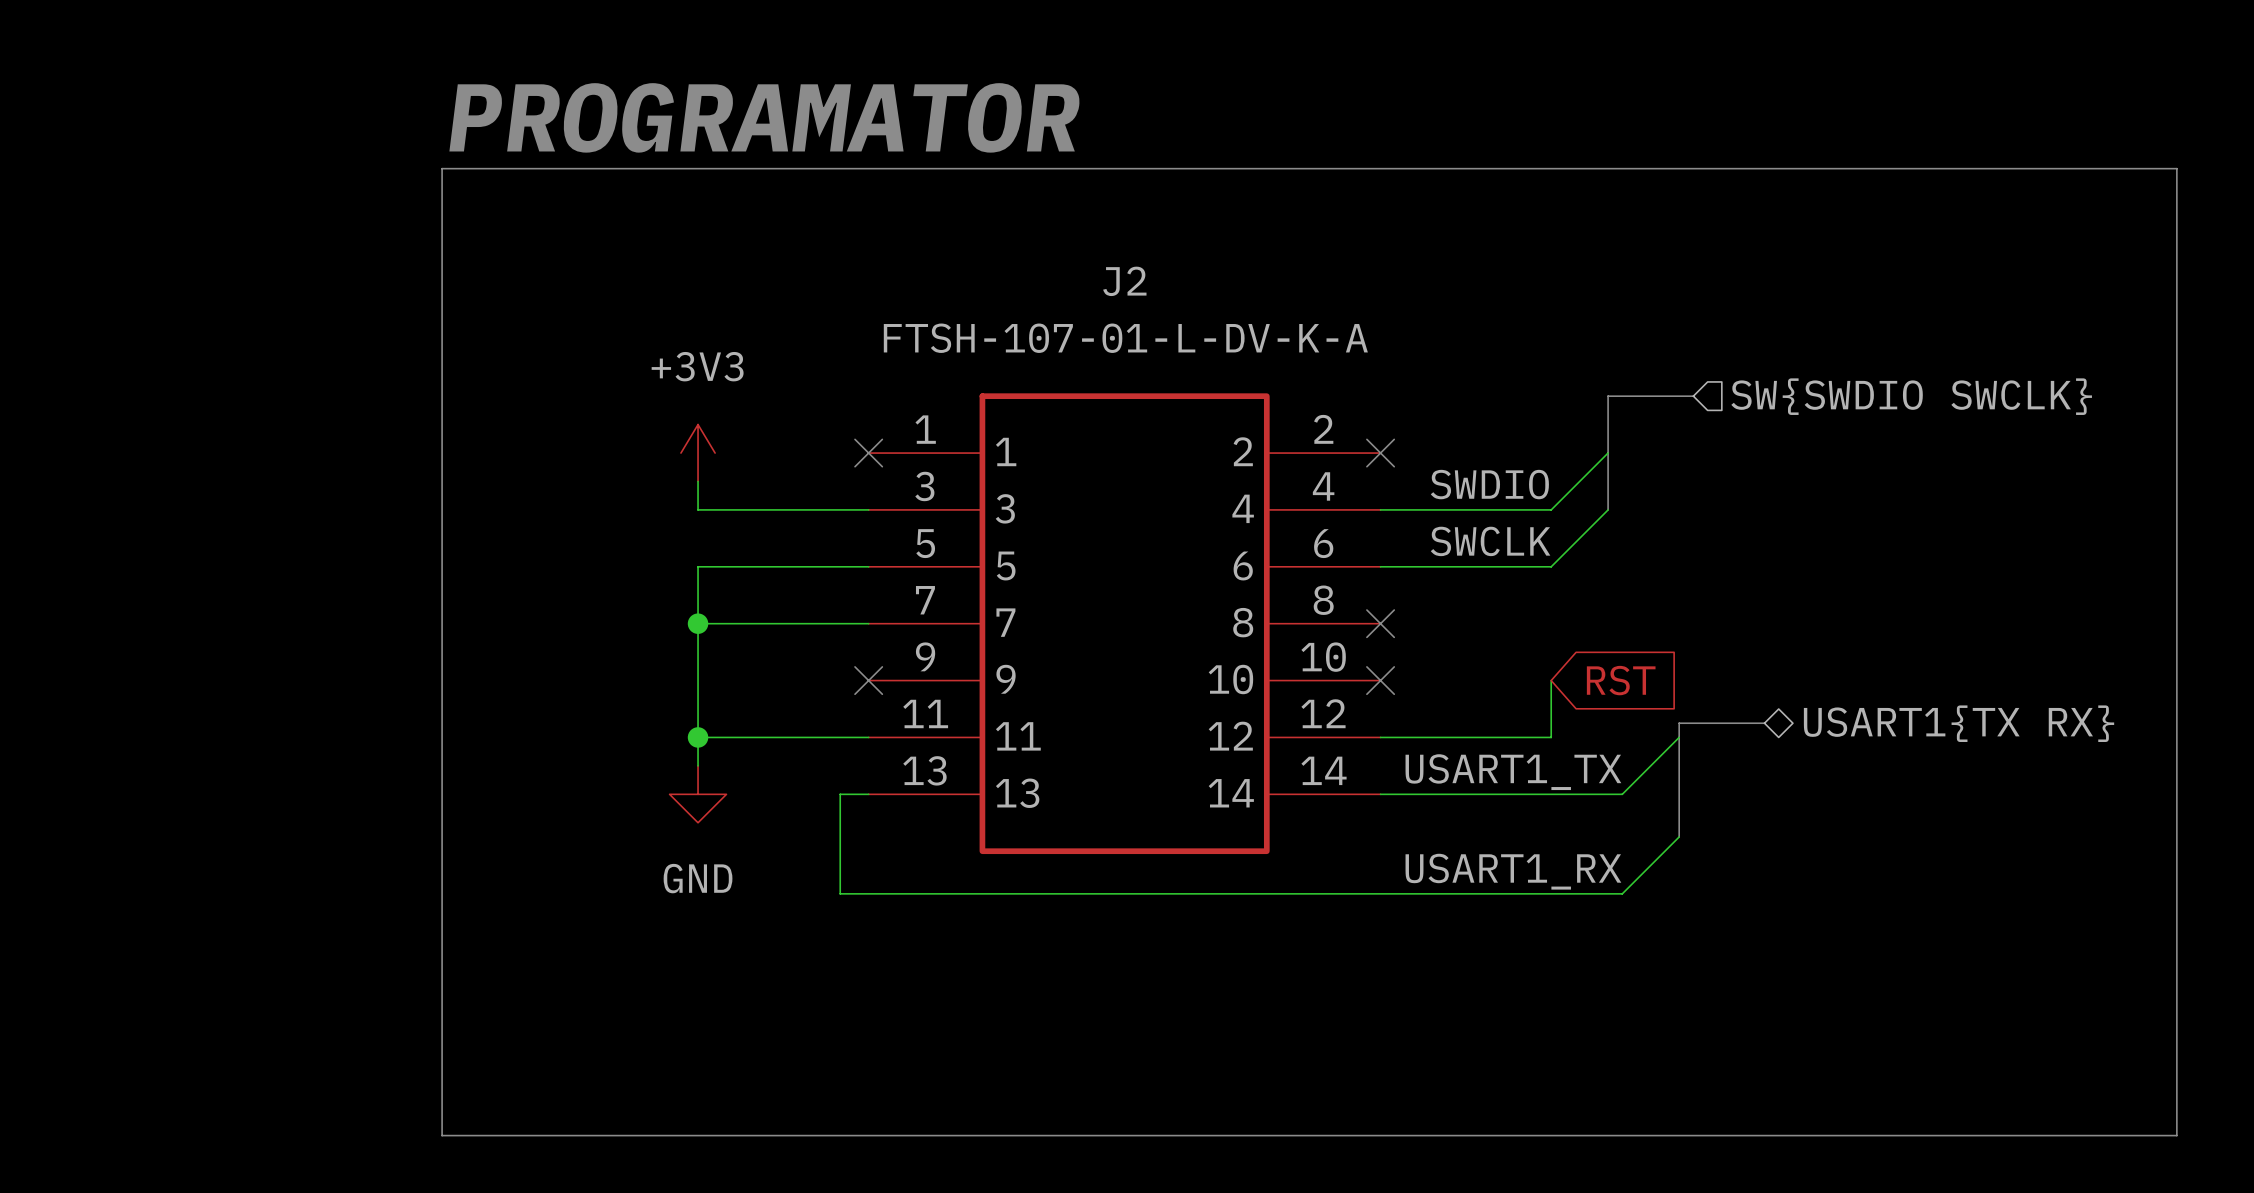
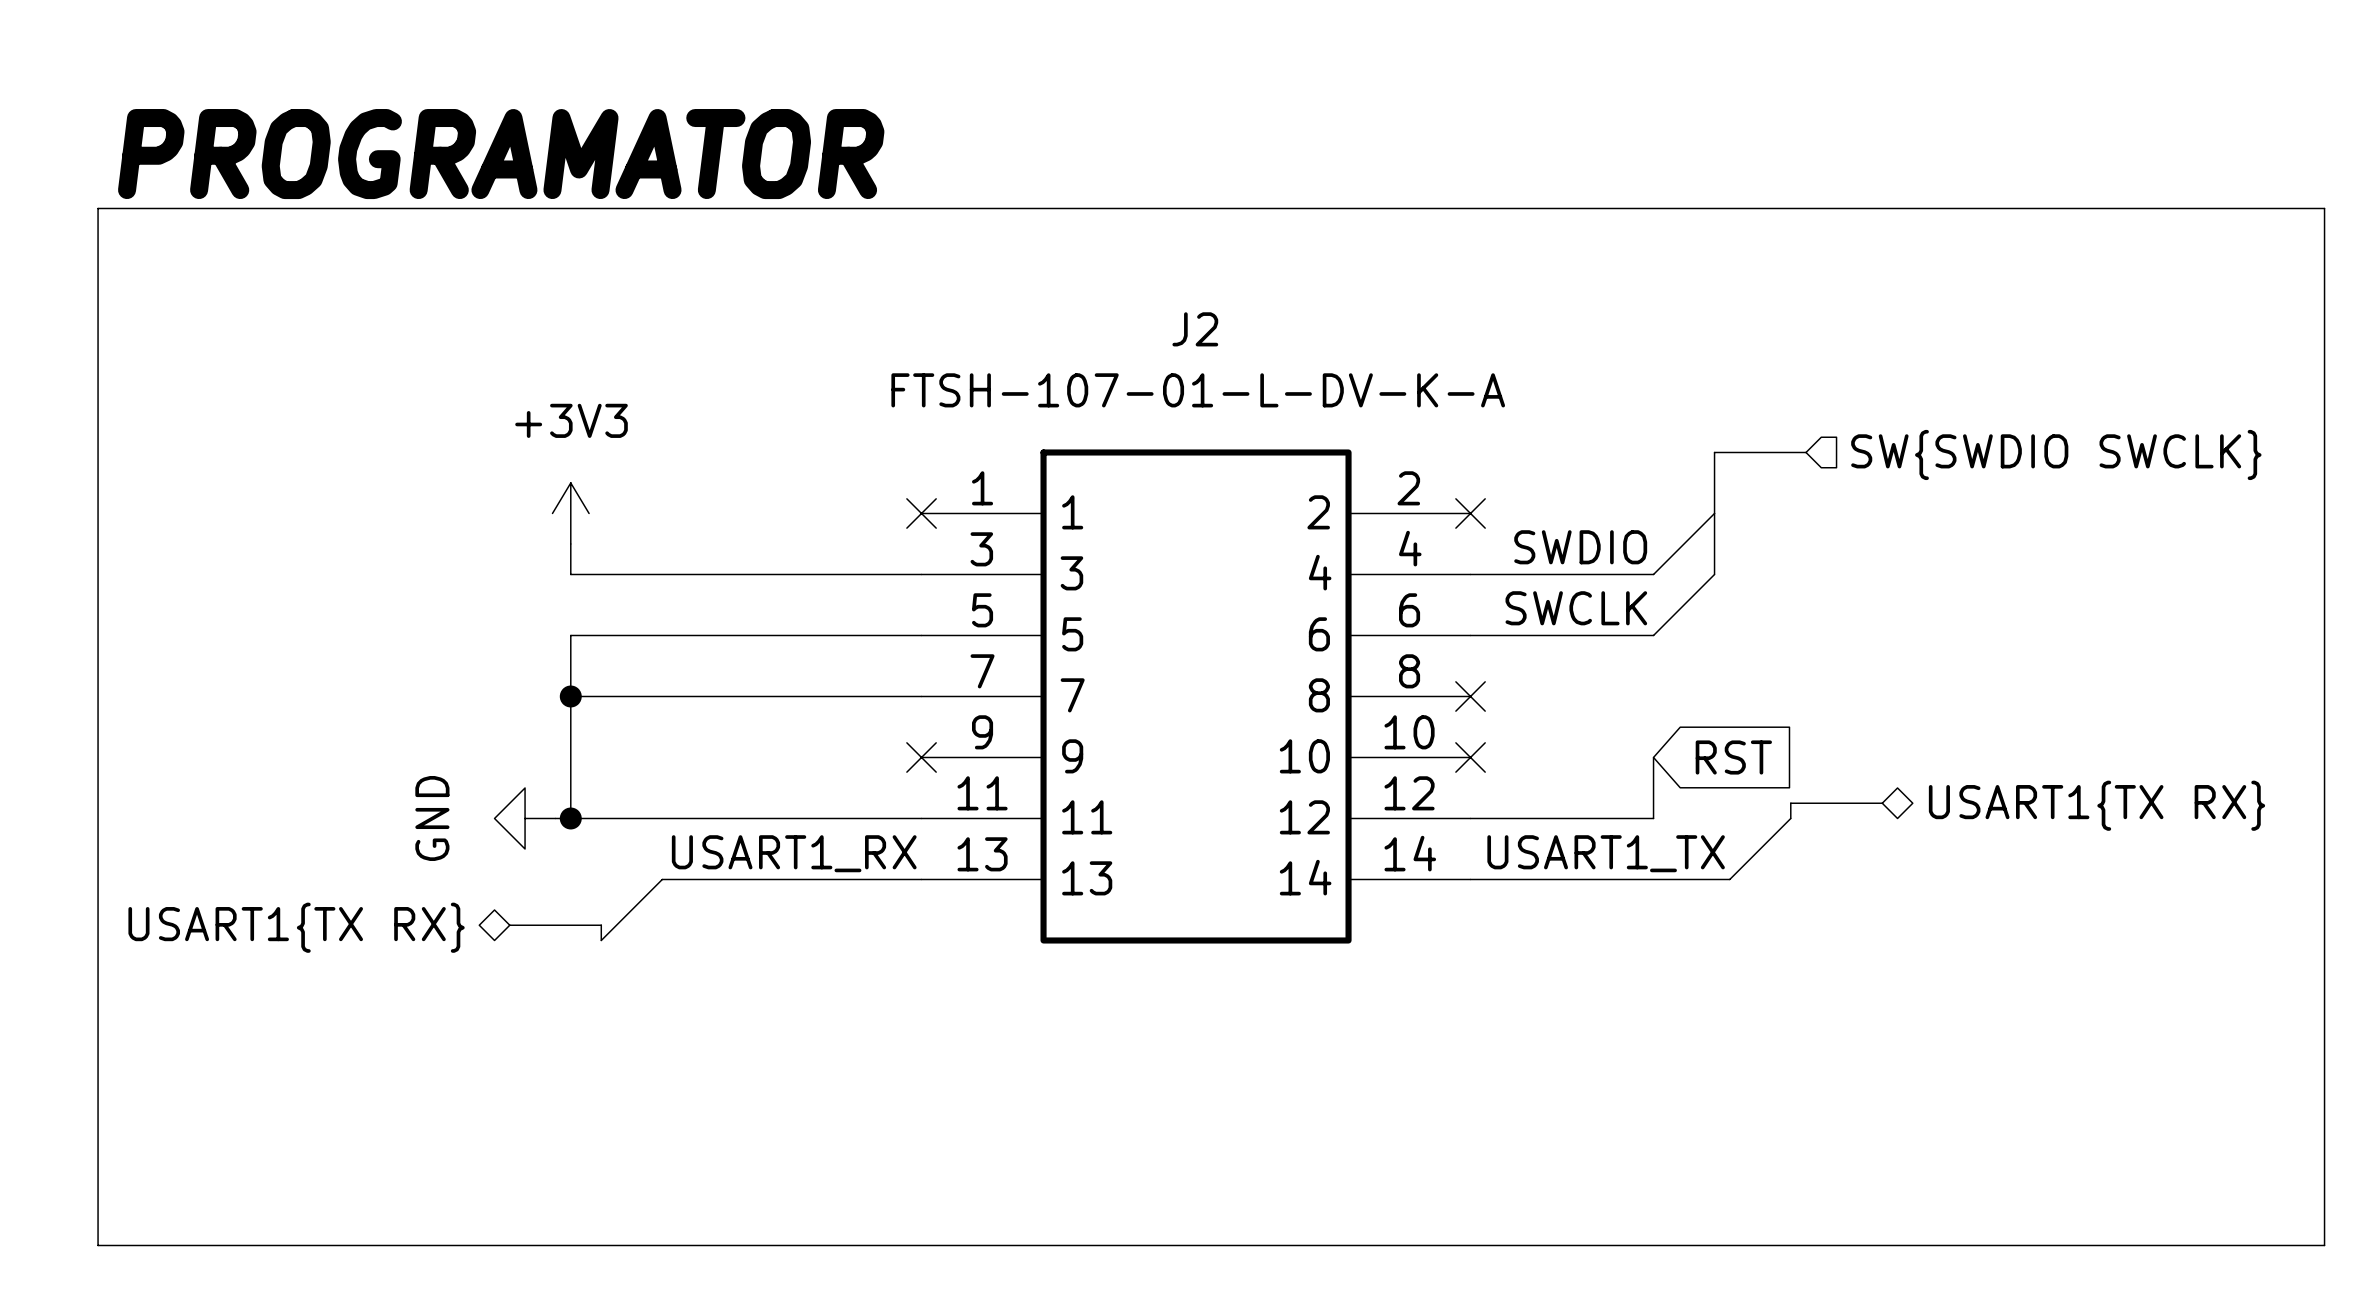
text position: PROGRAMATOR (764, 117) -> PROGRAMATOR (501, 154)
line: (442, 168) (442, 1135) -> (464, 208) (98, 208) (98, 1245) (464, 1245)
power symbol position: +3V3 (698, 453) -> +3V3 (570, 513)
wire: (698, 481) (698, 509) -> (570, 543) (570, 574) (738, 574)
wire: (698, 566) (698, 765) -> (738, 635) (570, 635) (570, 818)
wire: none -> (570, 696) (738, 696)
junction: none -> (570, 696)
junction: (698, 623) -> none
wire: none -> (555, 818) (738, 818)
junction: none -> (570, 818)
junction: (698, 737) -> none
bus: (1679, 737) (1679, 836) -> none
label: none -> USART1_RX (794, 853)
power symbol rotation: 0° (698, 794) -> 90° clockwise (525, 818)
power symbol position: GND (698, 794) -> GND (525, 818)
wire: (840, 794) (840, 893) (1622, 893) (1679, 836) -> (891, 879) (662, 879) (601, 940)
bus: none -> (509, 925) (601, 925) (601, 940)
hierarchical label: none -> USART1{TX RX} (296, 927)
label: USART1_RX (1513, 871) -> none

